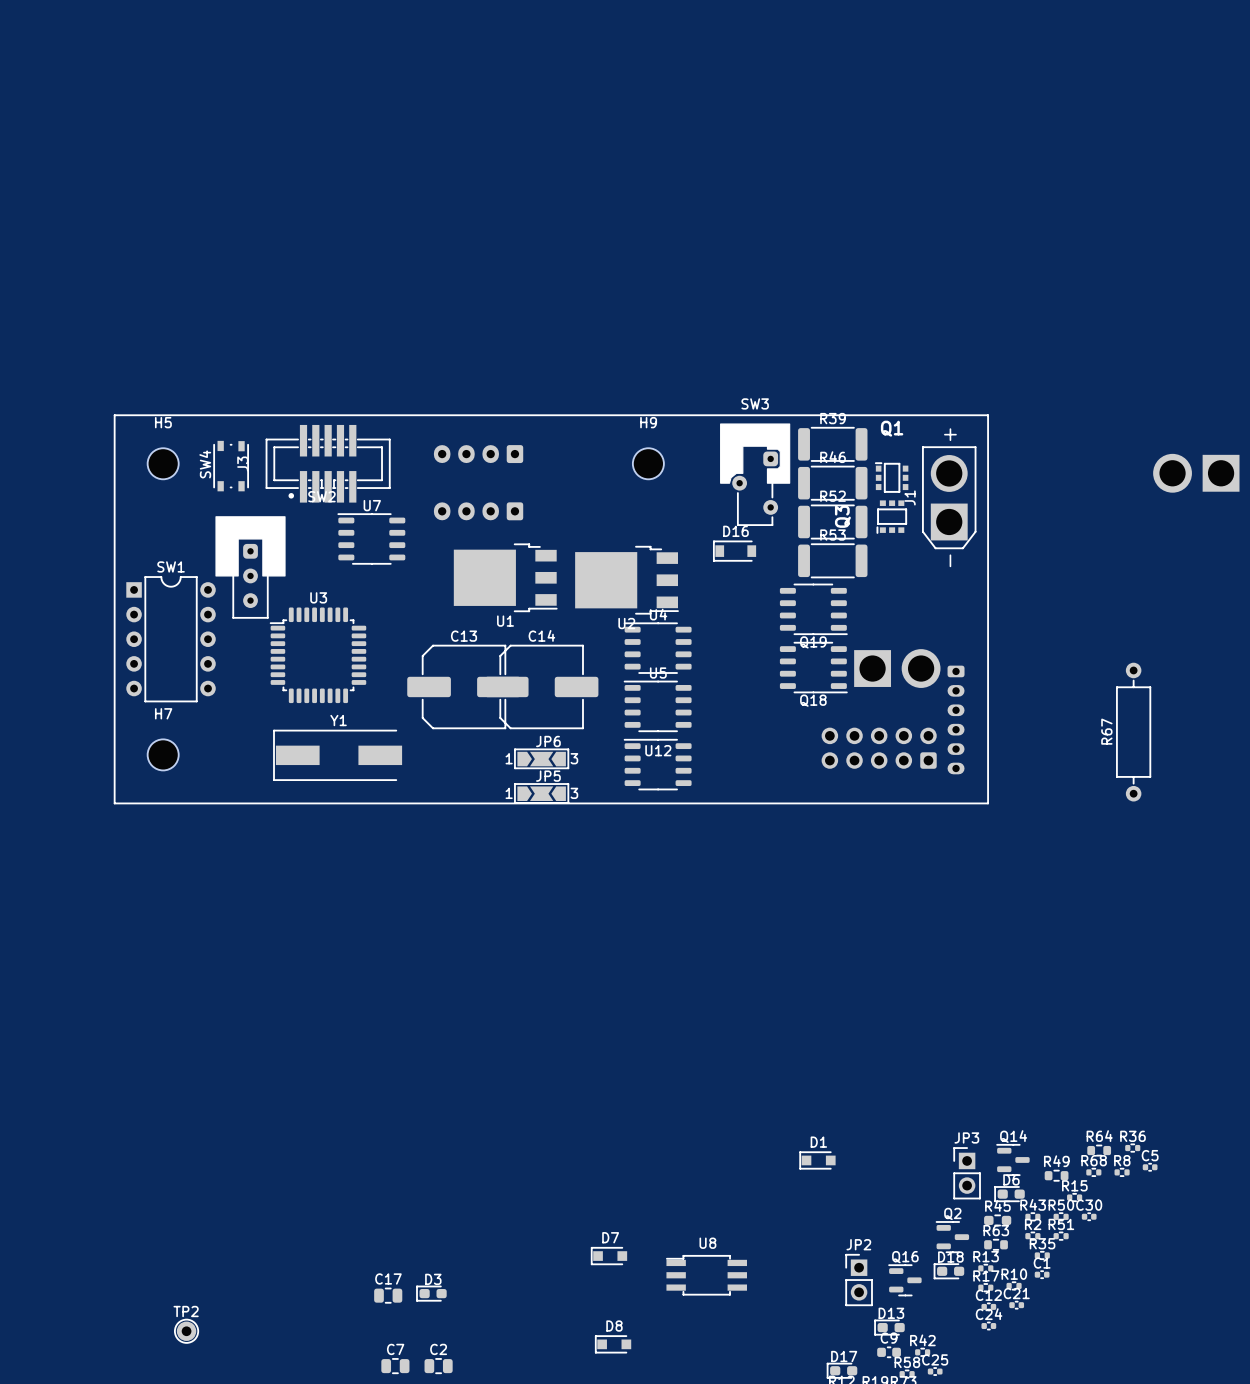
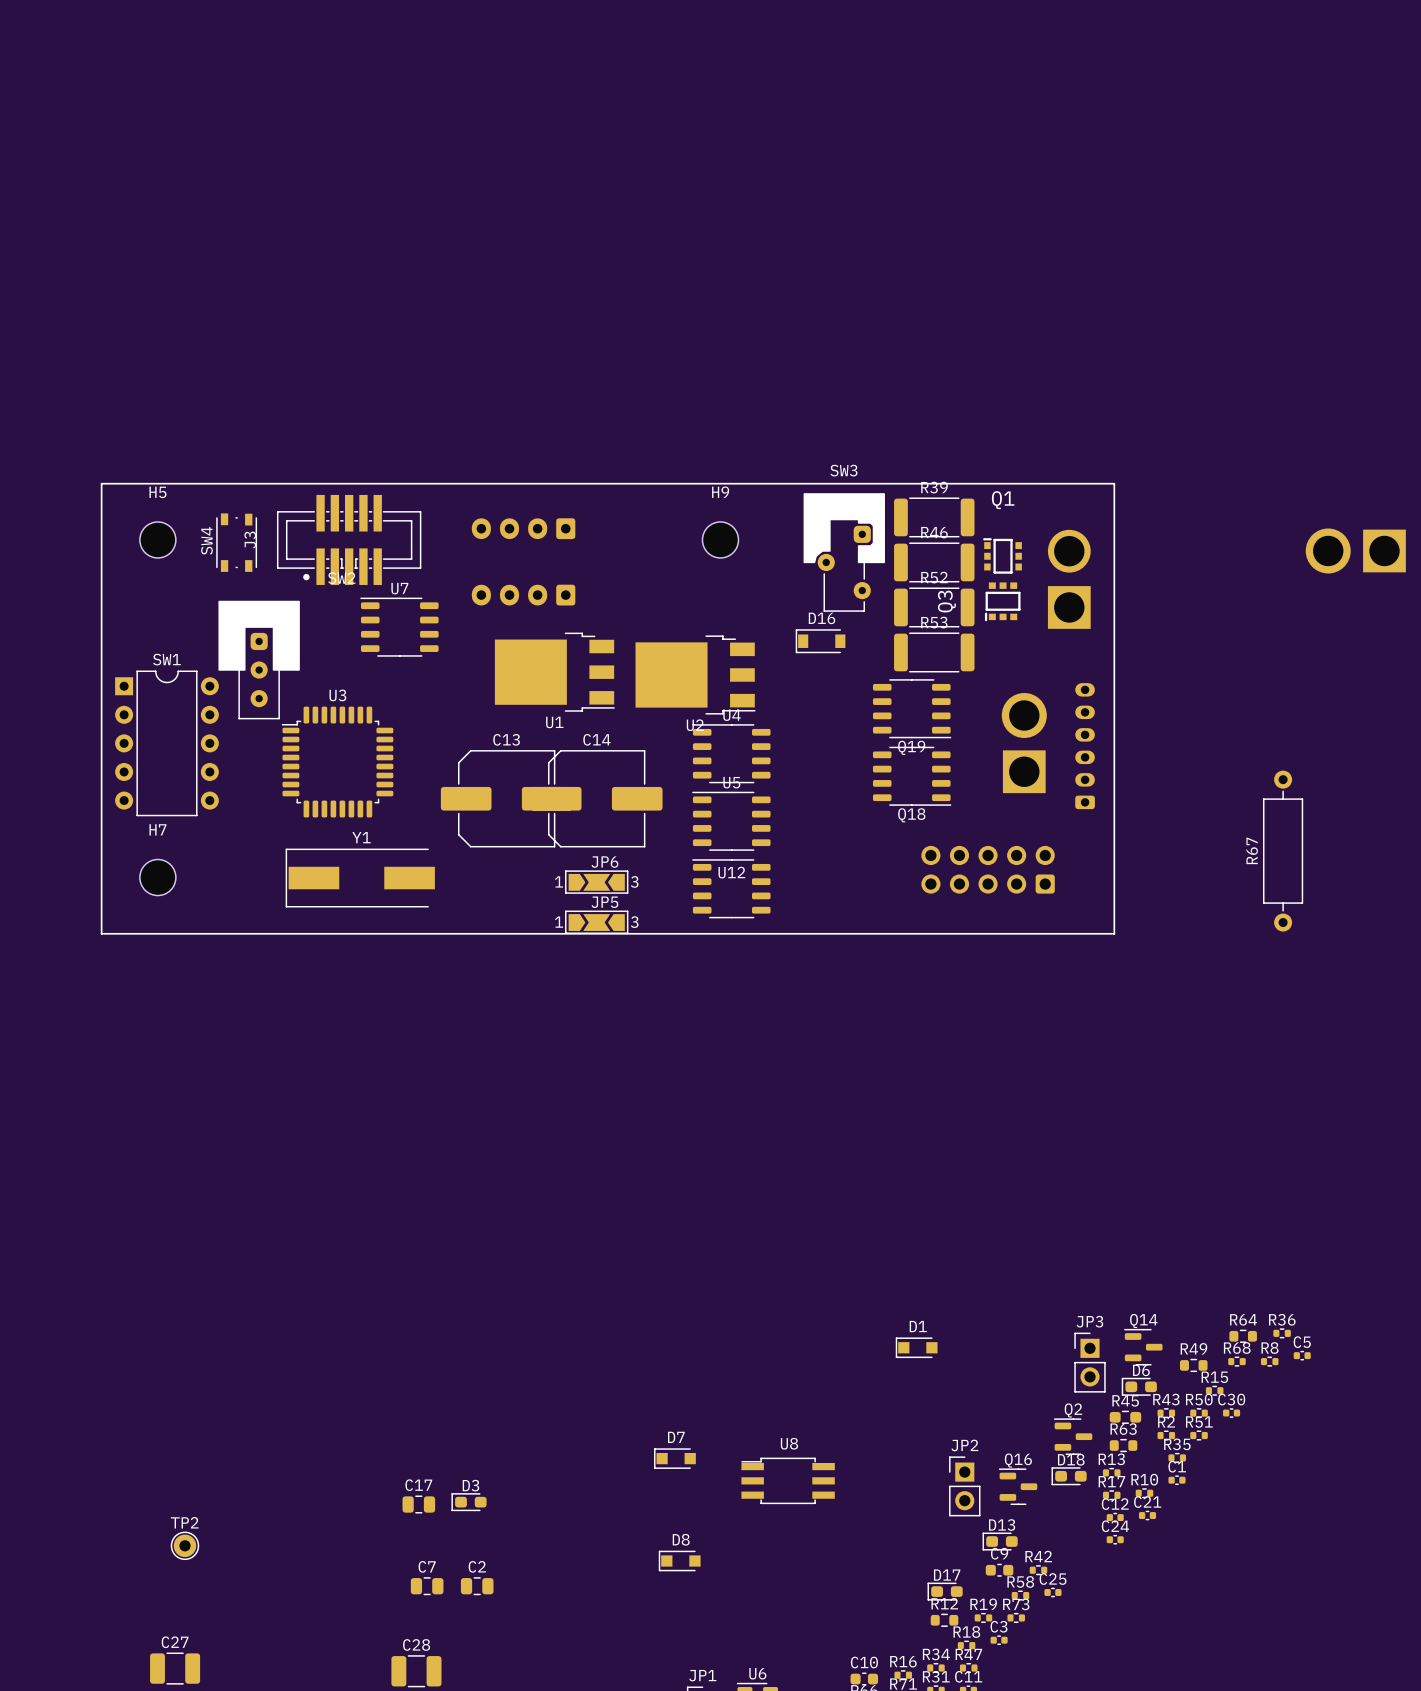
J1 side: top (949, 497) -> bottom (1069, 579)
part rotation: 0° (897, 668) -> 90° counterclockwise (1024, 743)
part rotation: 0° (956, 719) -> 180° (1085, 746)
part position: (956, 719) -> (1085, 746)

